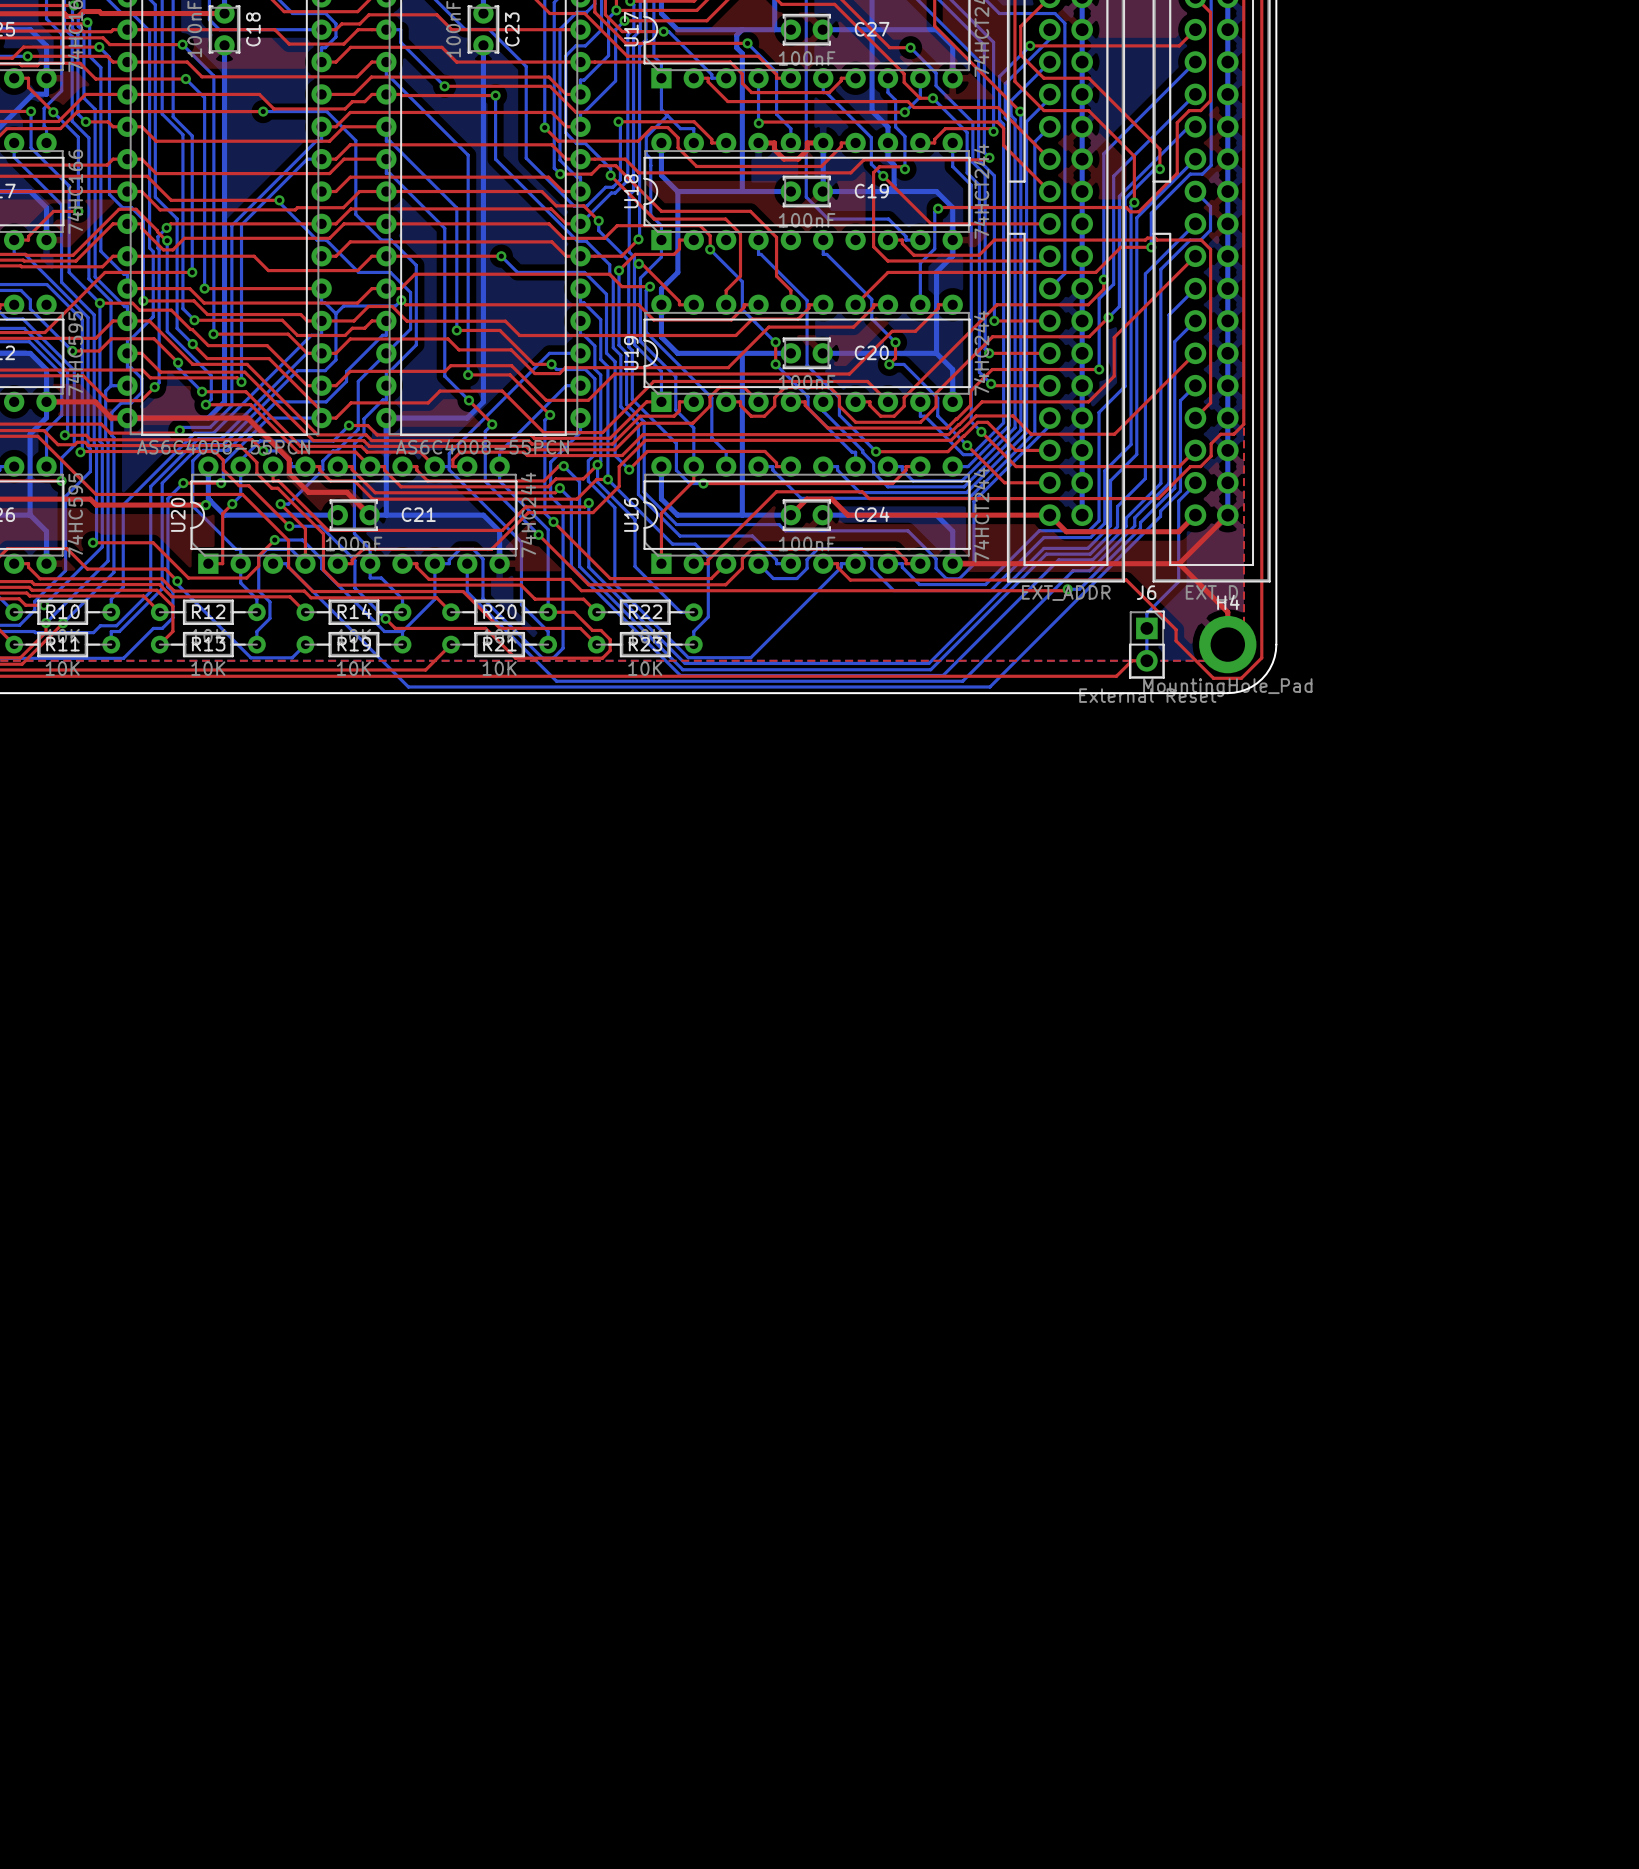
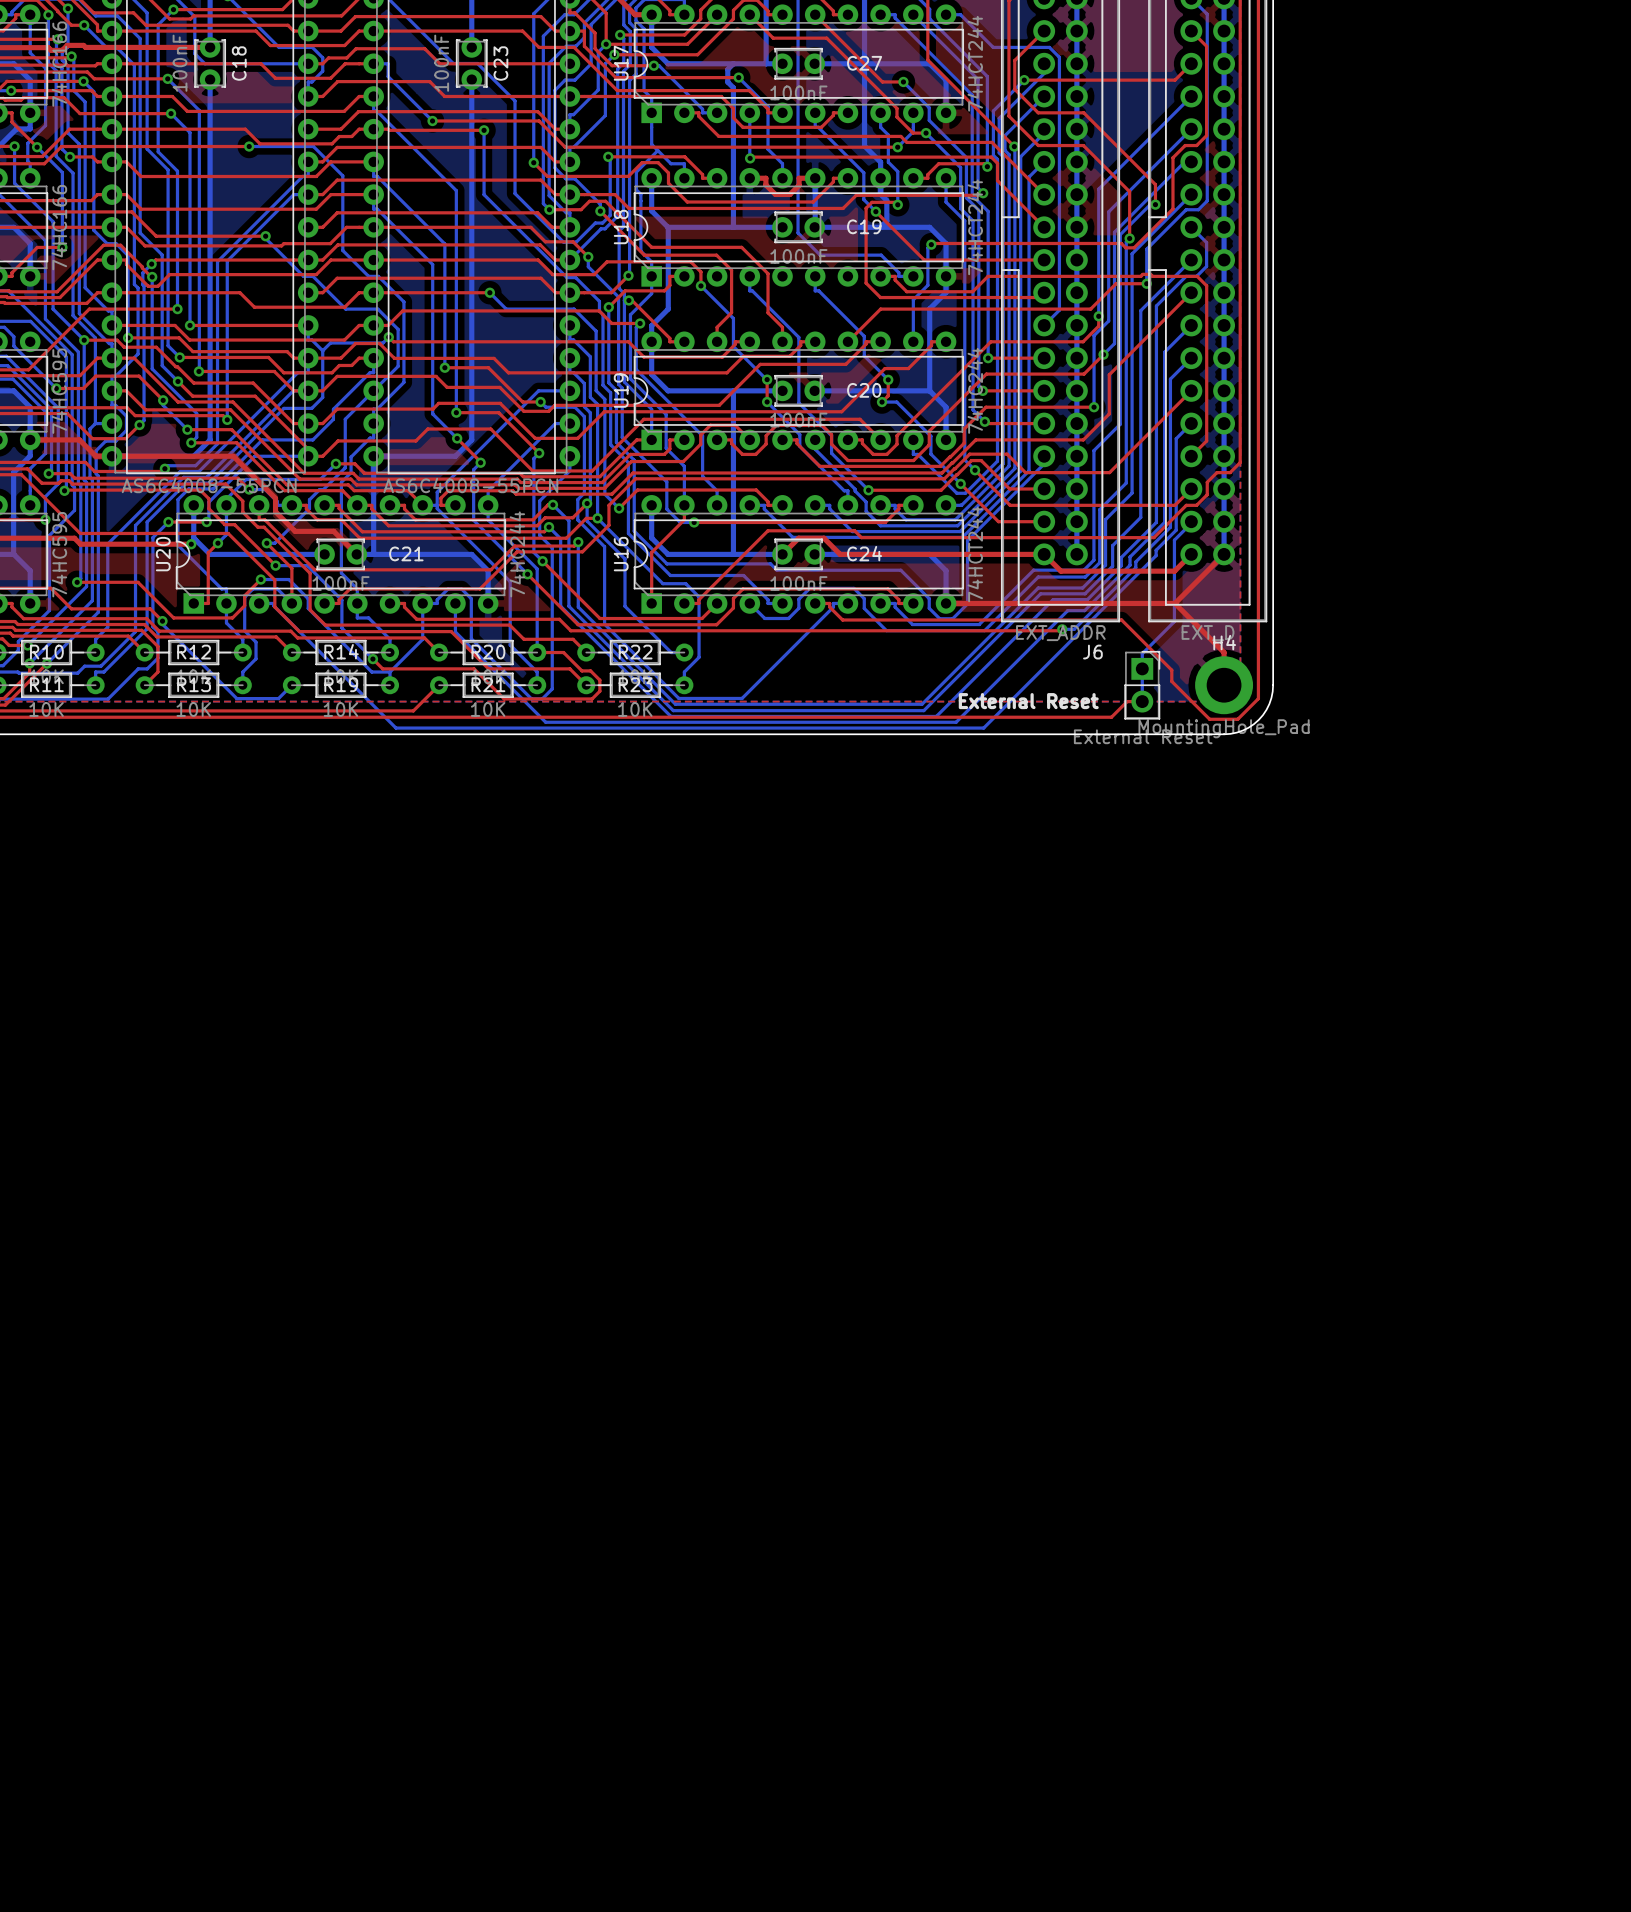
J6 name position: J6 (1146, 592) -> J6 (1092, 652)
text: none -> External Reset (1028, 701)

